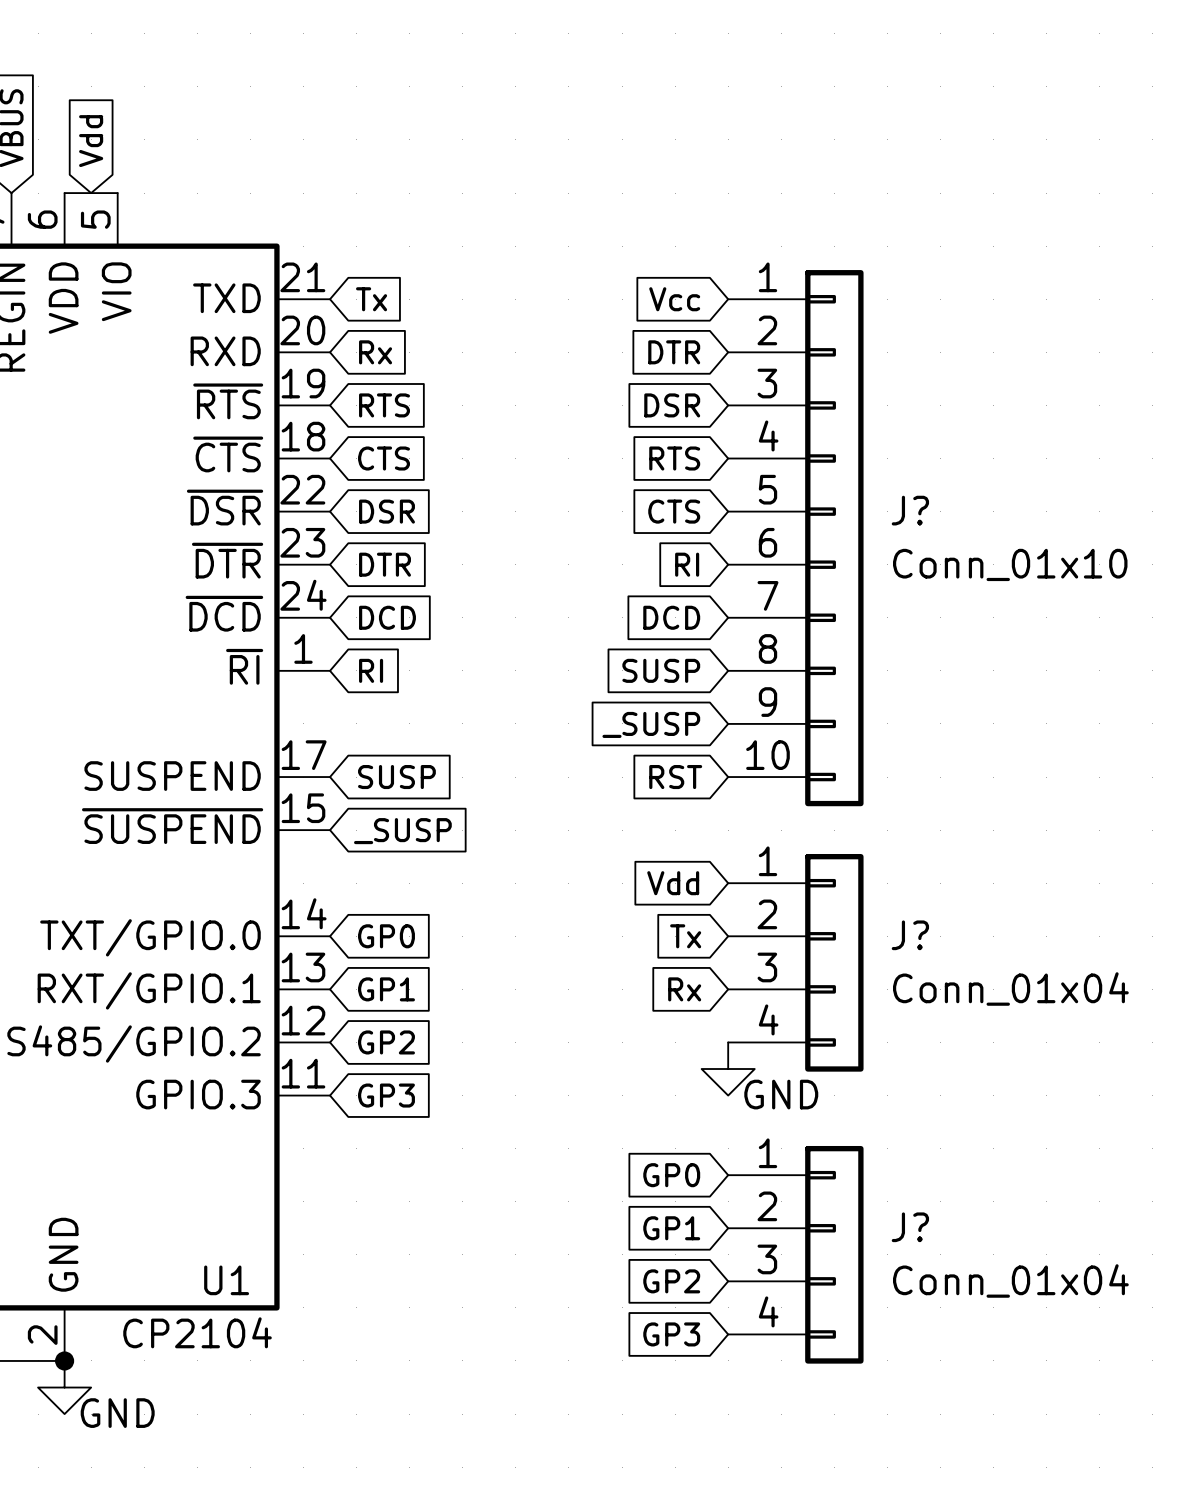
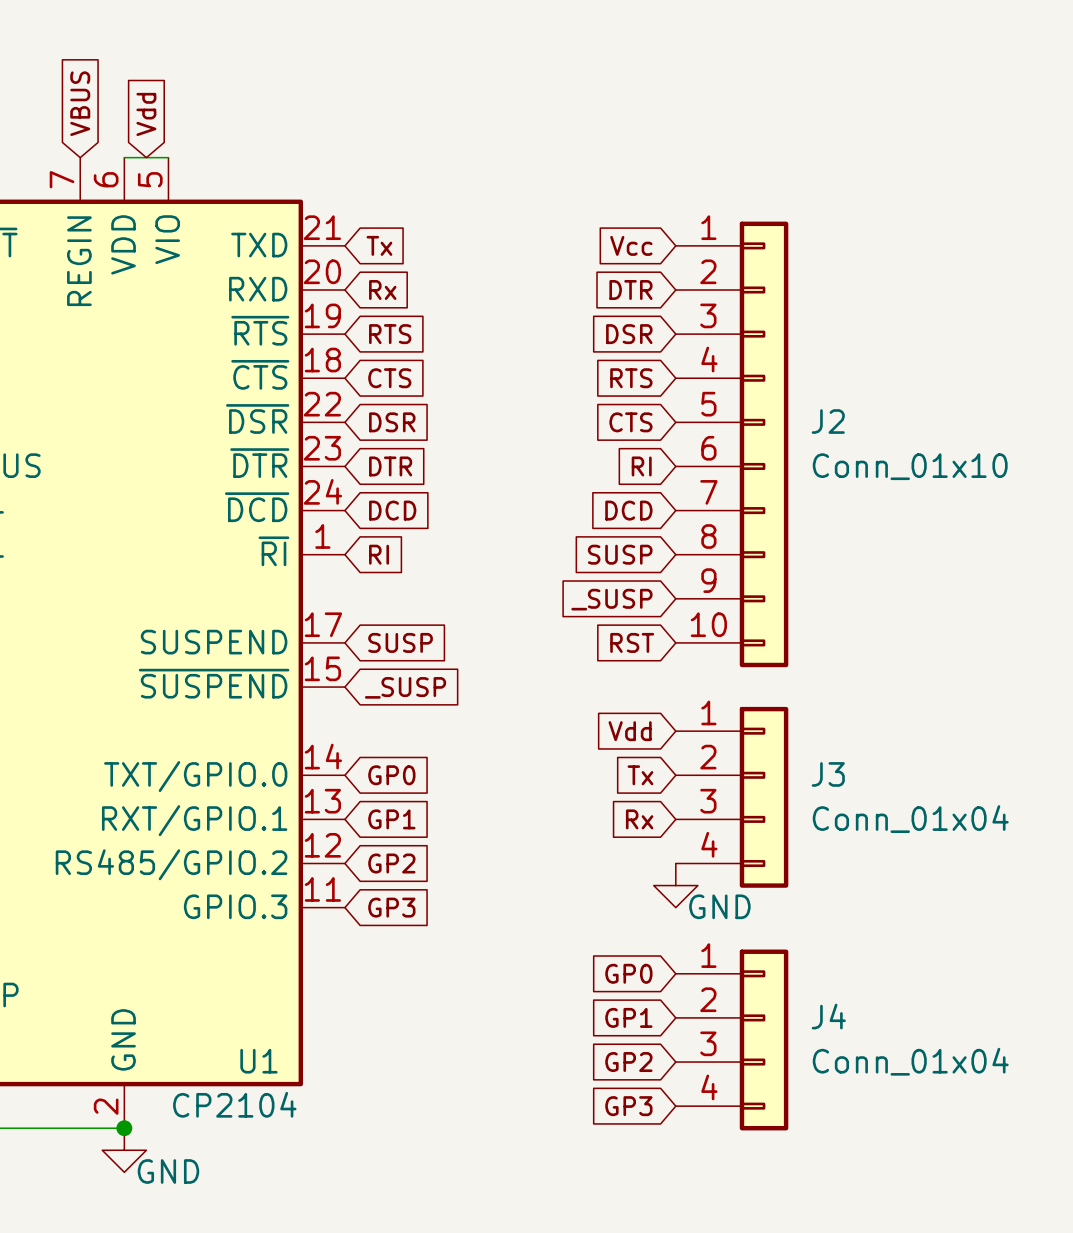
J? name: J? (910, 510) -> J2 (828, 421)
J? name: J? (910, 935) -> J3 (828, 774)
J? name: J? (910, 1227) -> J4 (828, 1016)

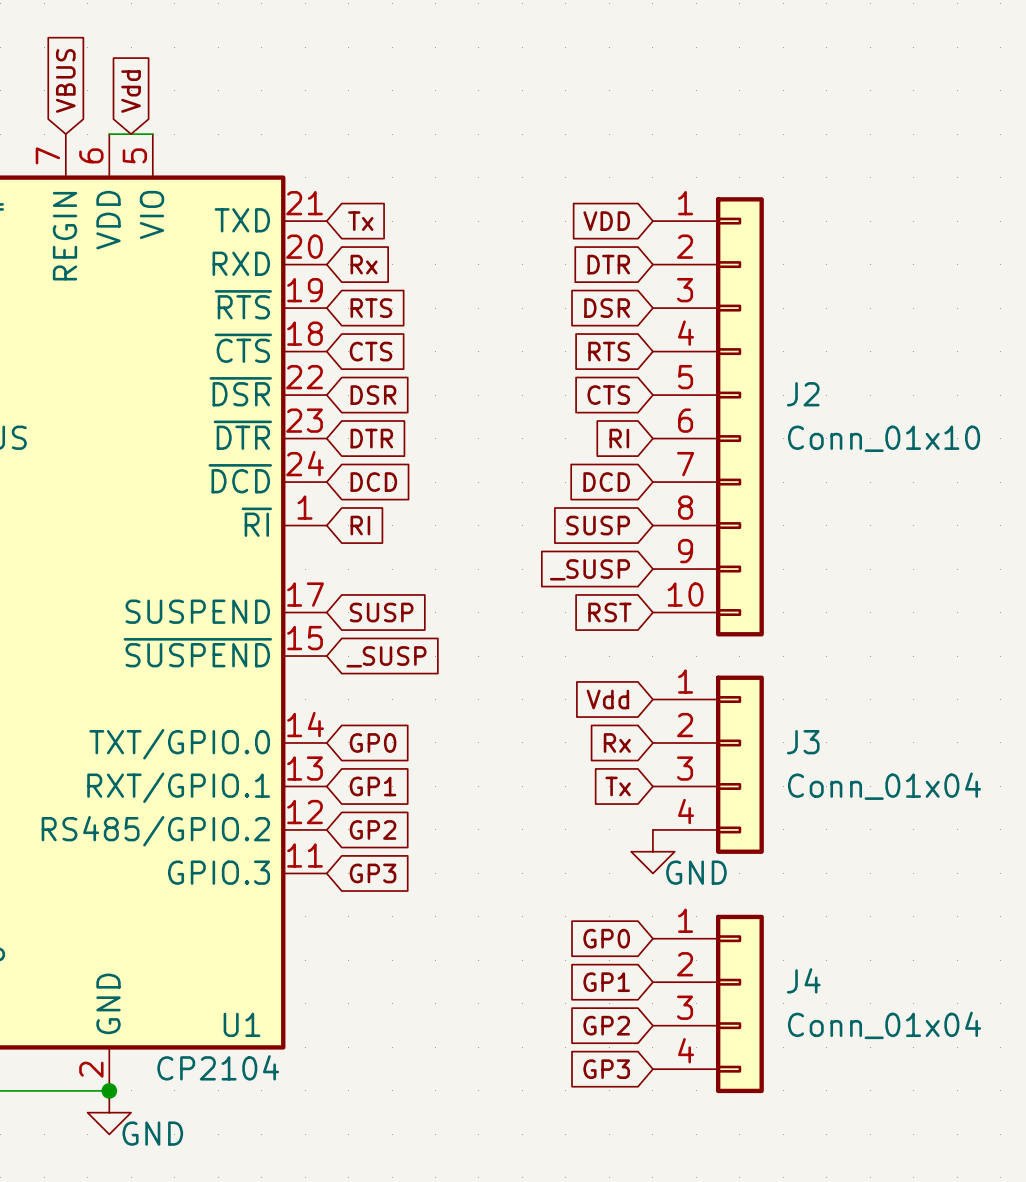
global label: Vcc (631, 245) -> VDD (606, 221)
global label: Tx (640, 775) -> Rx (617, 742)
global label: Rx (639, 819) -> Tx (618, 786)

